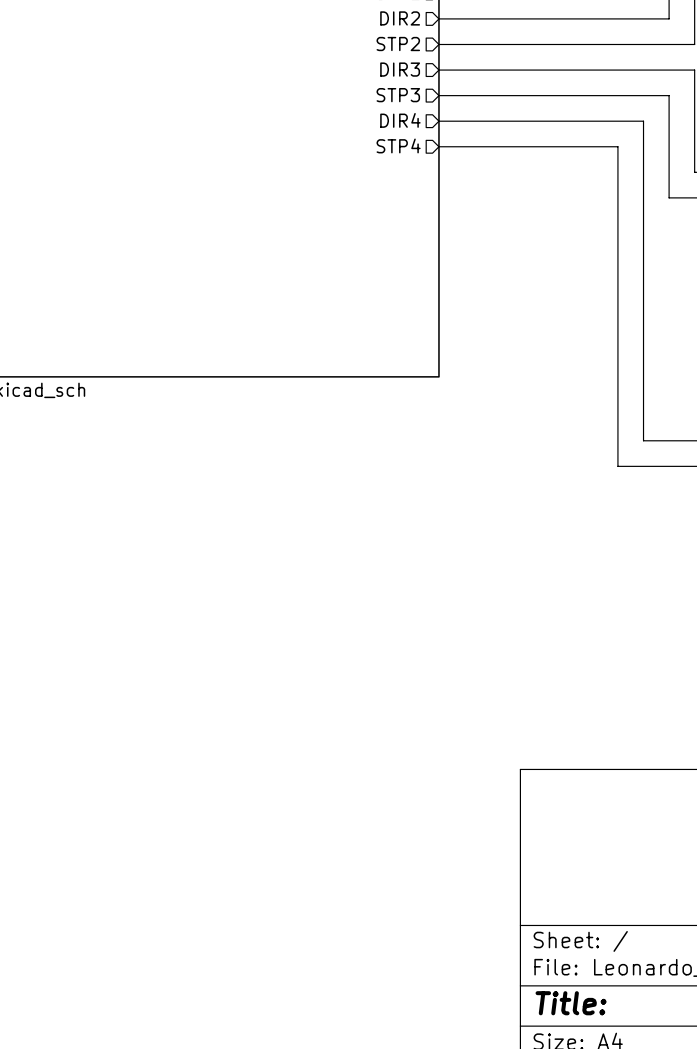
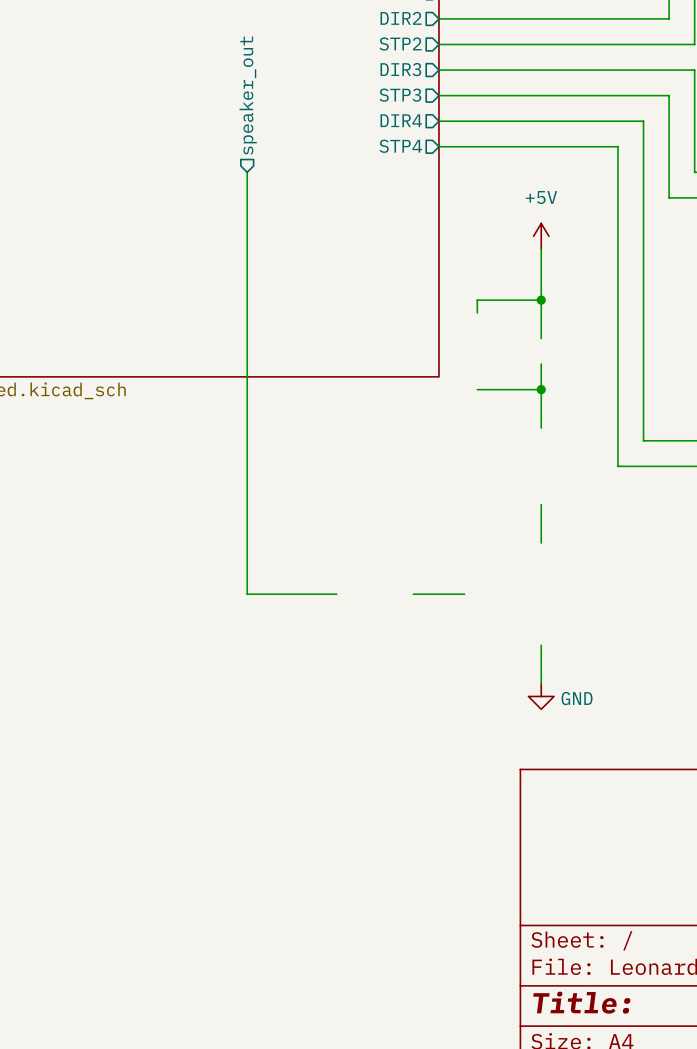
sheet pin: none -> speaker_out (248, 95)
wire: none -> (247, 172) (247, 594) (336, 594)
power symbol: none -> +5V (541, 236)
wire: none -> (541, 249) (541, 338)
wire: none -> (541, 300) (477, 300) (477, 312)
junction: none -> (541, 300)
wire: none -> (541, 364) (541, 428)
wire: none -> (477, 389) (541, 389)
junction: none -> (541, 389)
wire: none -> (541, 504) (541, 543)
wire: none -> (413, 594) (464, 594)
wire: none -> (541, 645) (541, 683)
power symbol: none -> GND (541, 696)

